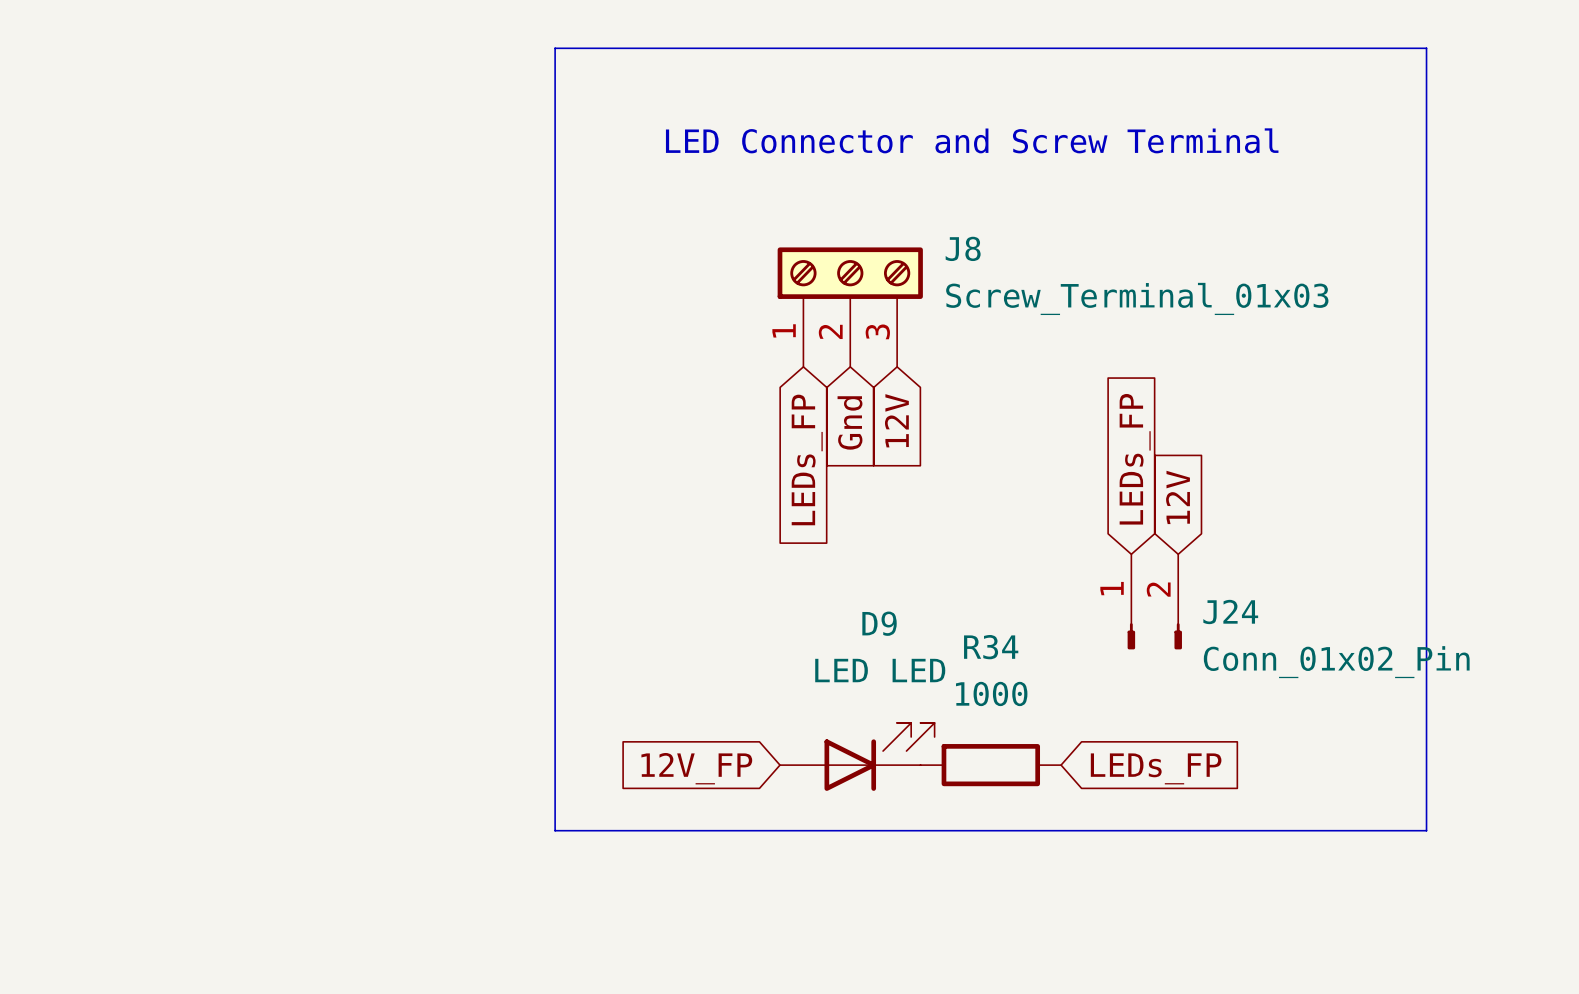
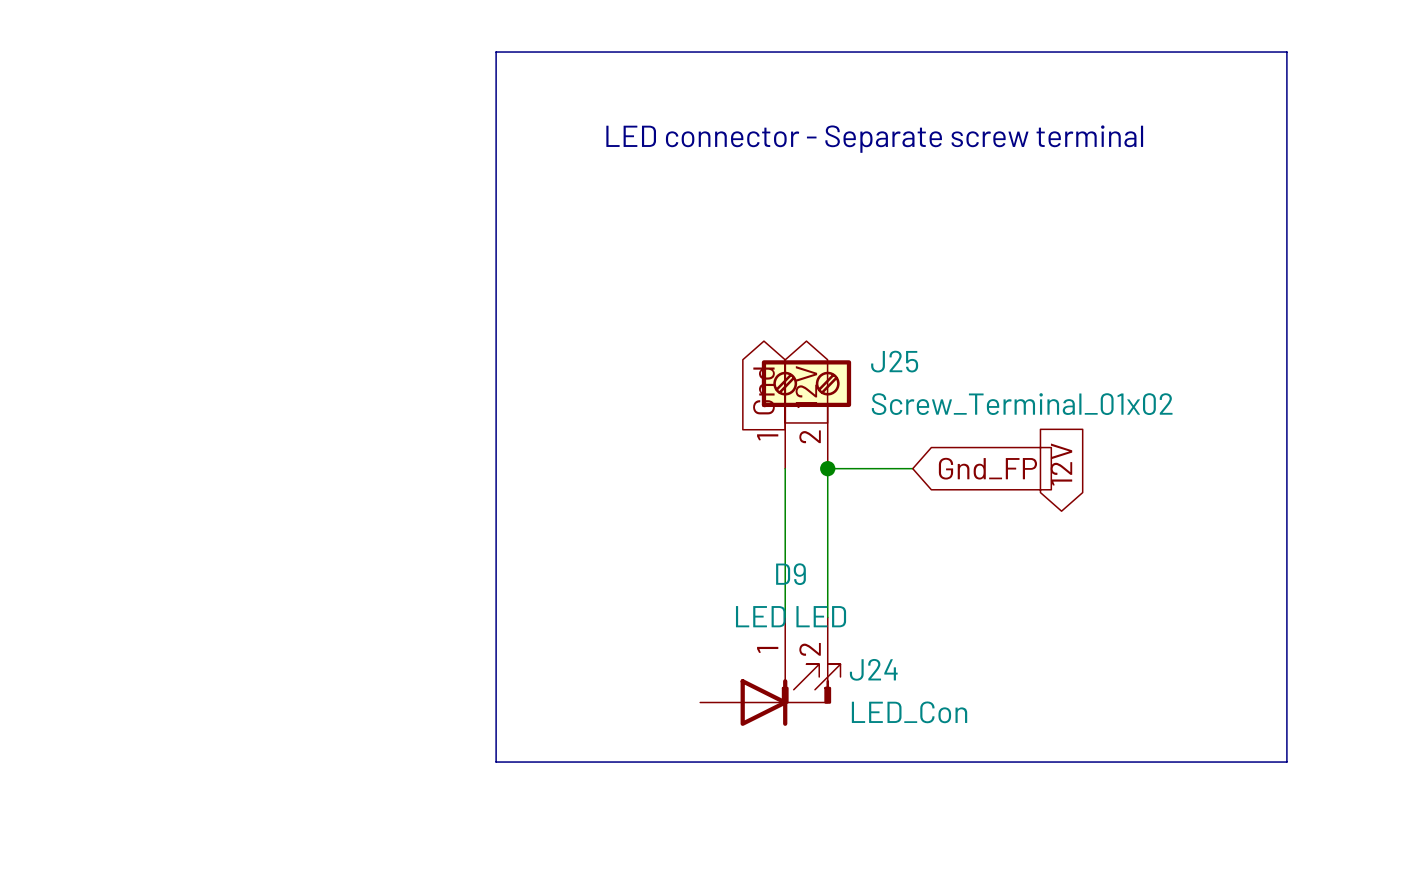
text: LED Connector and Screw Terminal (972, 140) -> LED connector - Separate screw terminal (874, 139)
J8: Screw_Terminal_01x03 (850, 307) -> none
J25: none -> Screw_Terminal_01x02 (806, 414)
global label: LEDs_FP (807, 459) -> none
global label: LEDs_FP (1135, 459) -> none
wire: none -> (785, 468) (785, 617)
junction: none -> (827, 468)
wire: none -> (912, 468) (827, 468) (827, 617)
global label: none -> Gnd_FP (987, 468)
J24 position: (1154, 601) -> (806, 660)
J24 value: Conn_01x02_Pin (1336, 662) -> LED_Con (909, 712)
R34: 1000 (990, 765) -> none
global label: 12V_FP (696, 768) -> none
global label: LEDs_FP (1156, 768) -> none

